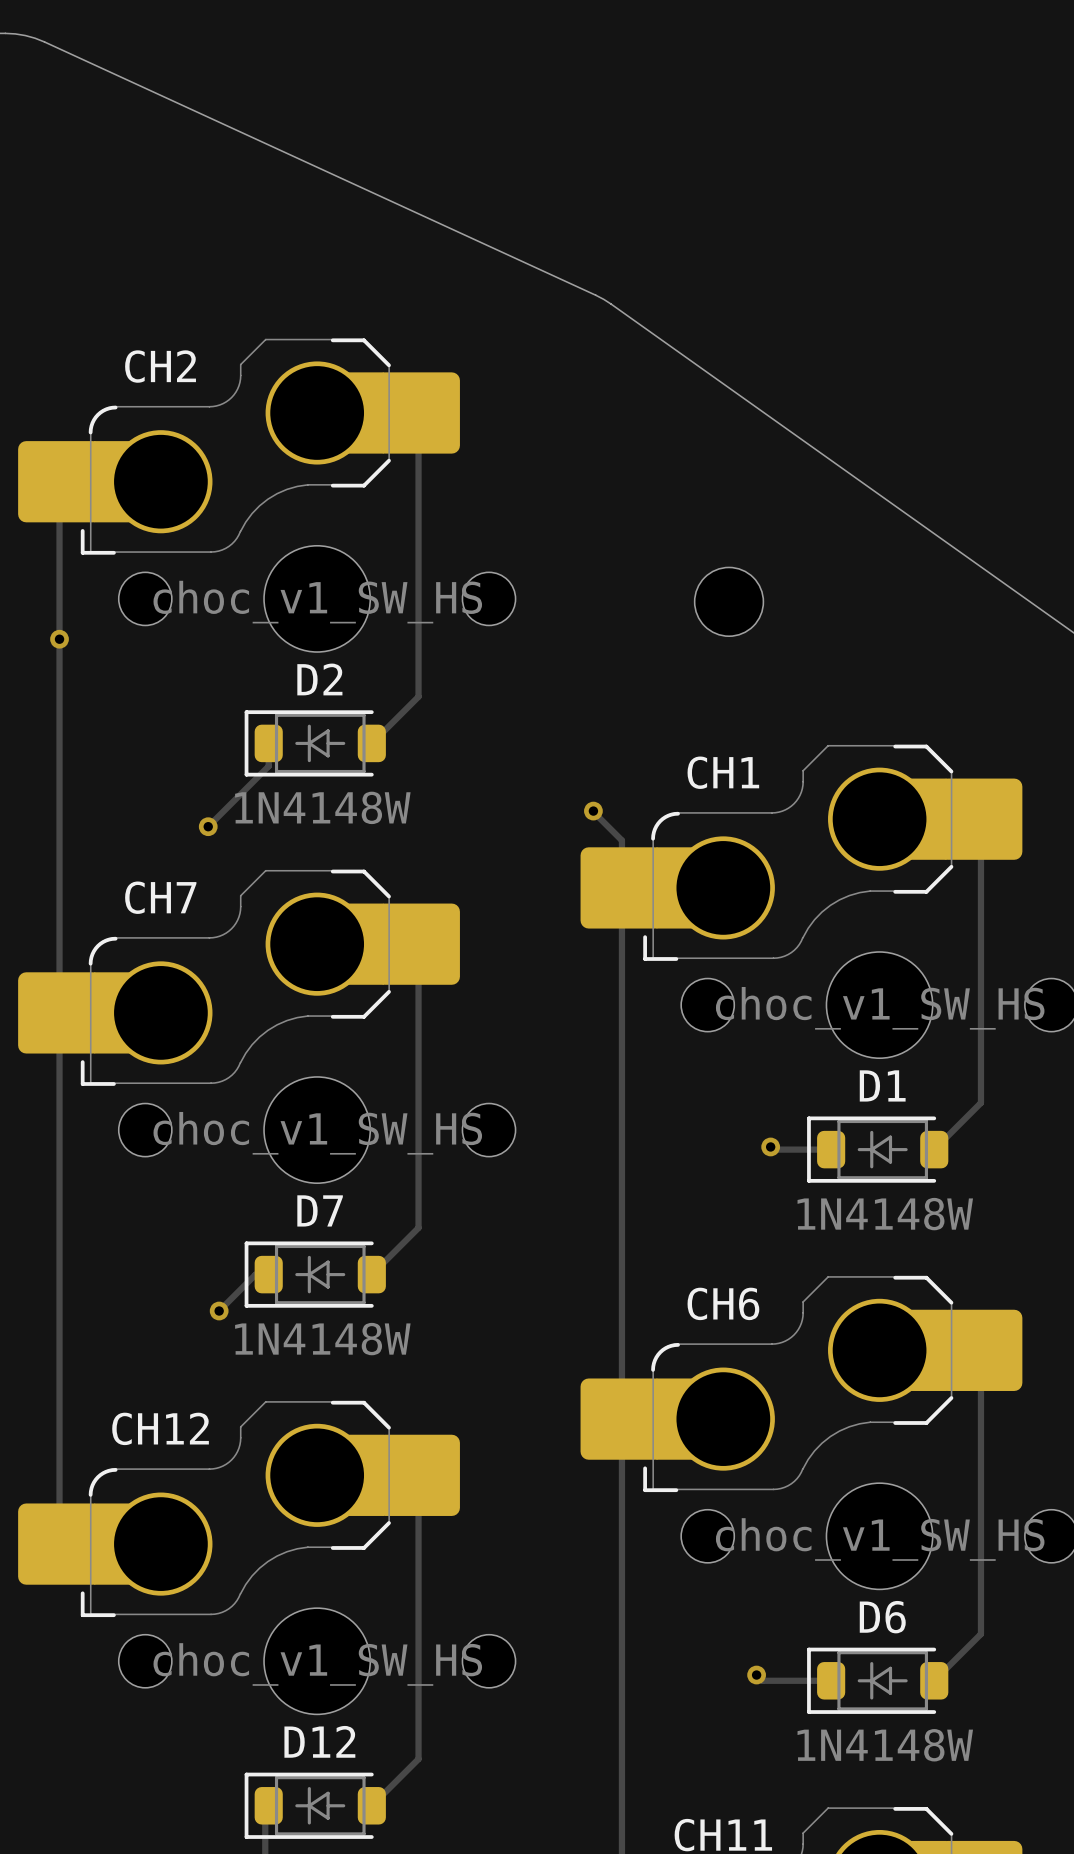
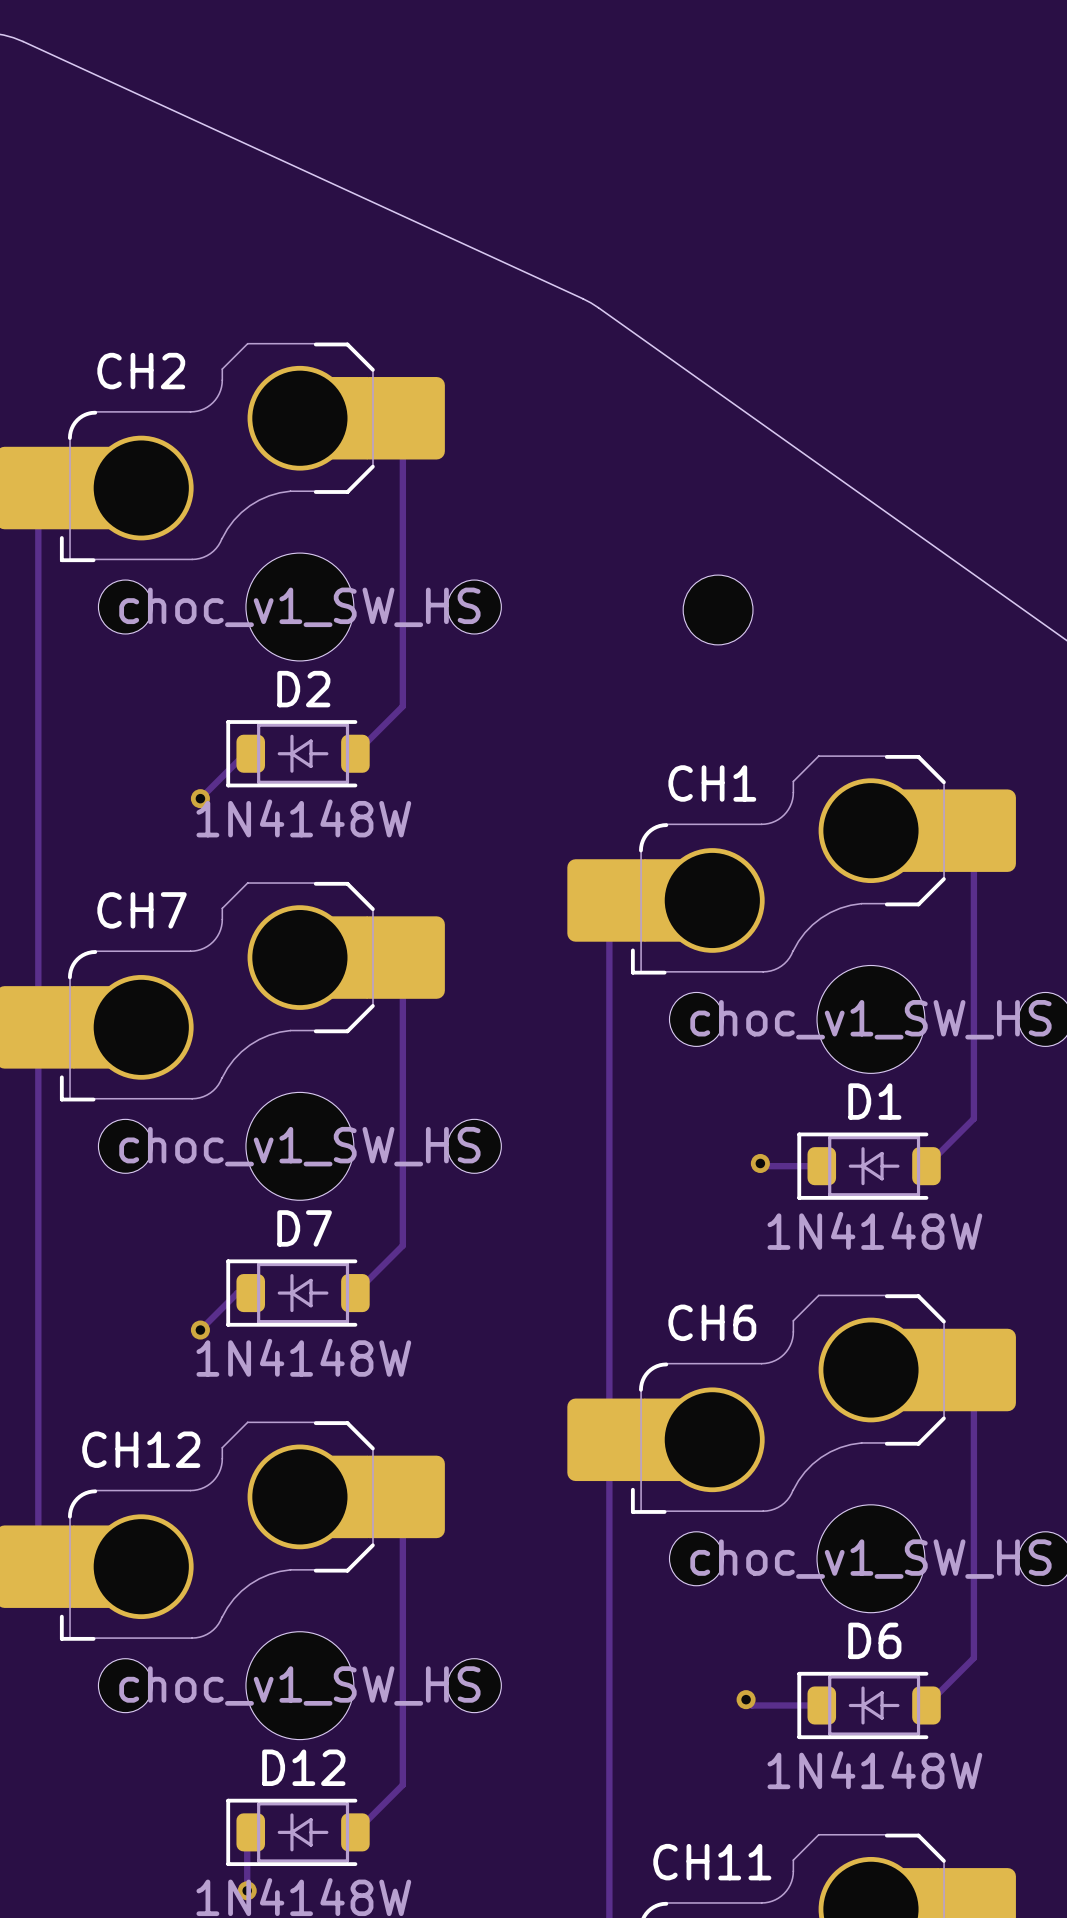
via: (59, 639) -> none
track: (268, 743) (268, 766) (208, 826) -> (250, 753) (245, 753) (200, 798)
via: (593, 811) -> none
track: (595, 814) (621, 840) (621, 887) -> none
via position: (208, 826) -> (200, 798)

